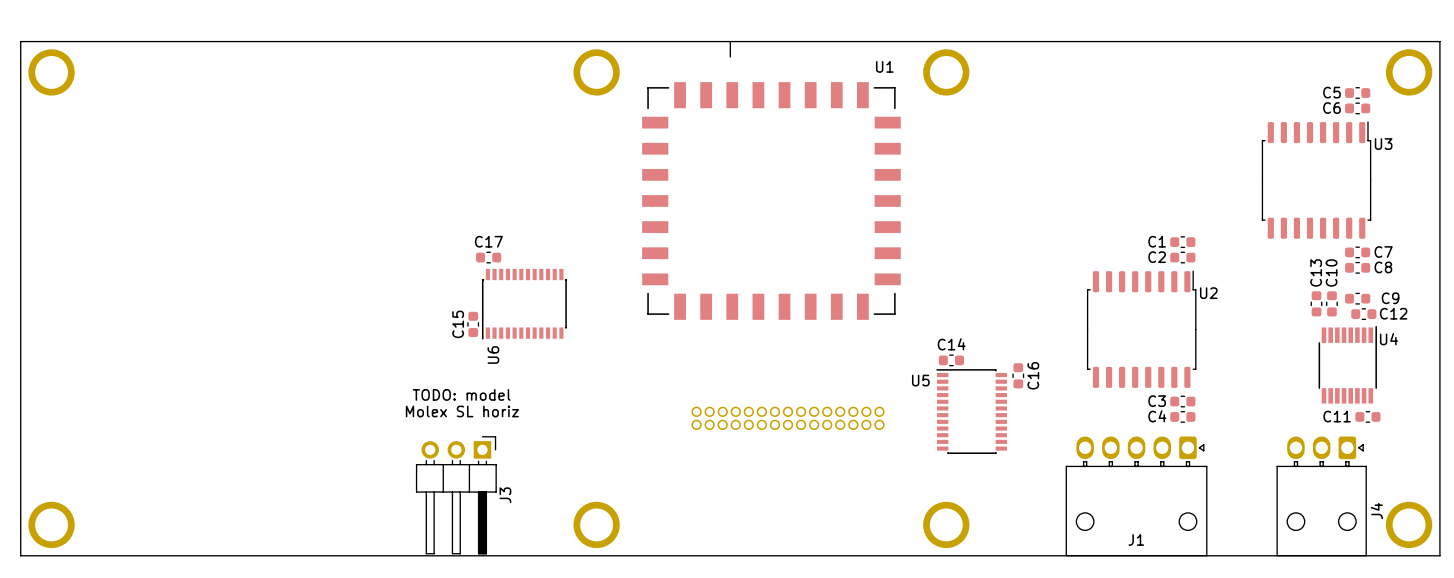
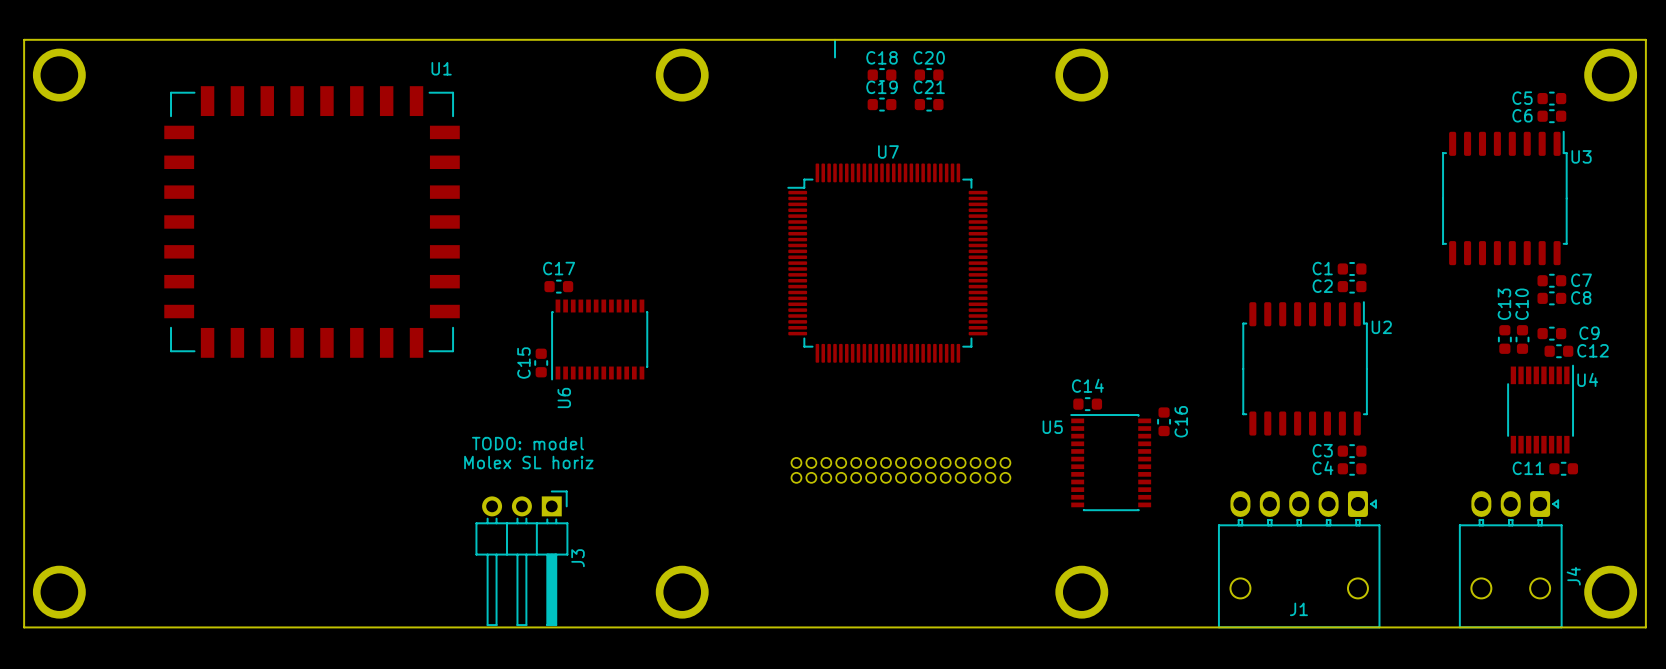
C18: none -> (882, 75)
C20: none -> (929, 75)
C19: none -> (882, 104)
C21: none -> (929, 104)
U1 position: (771, 200) -> (312, 221)
U7: none -> (887, 263)

